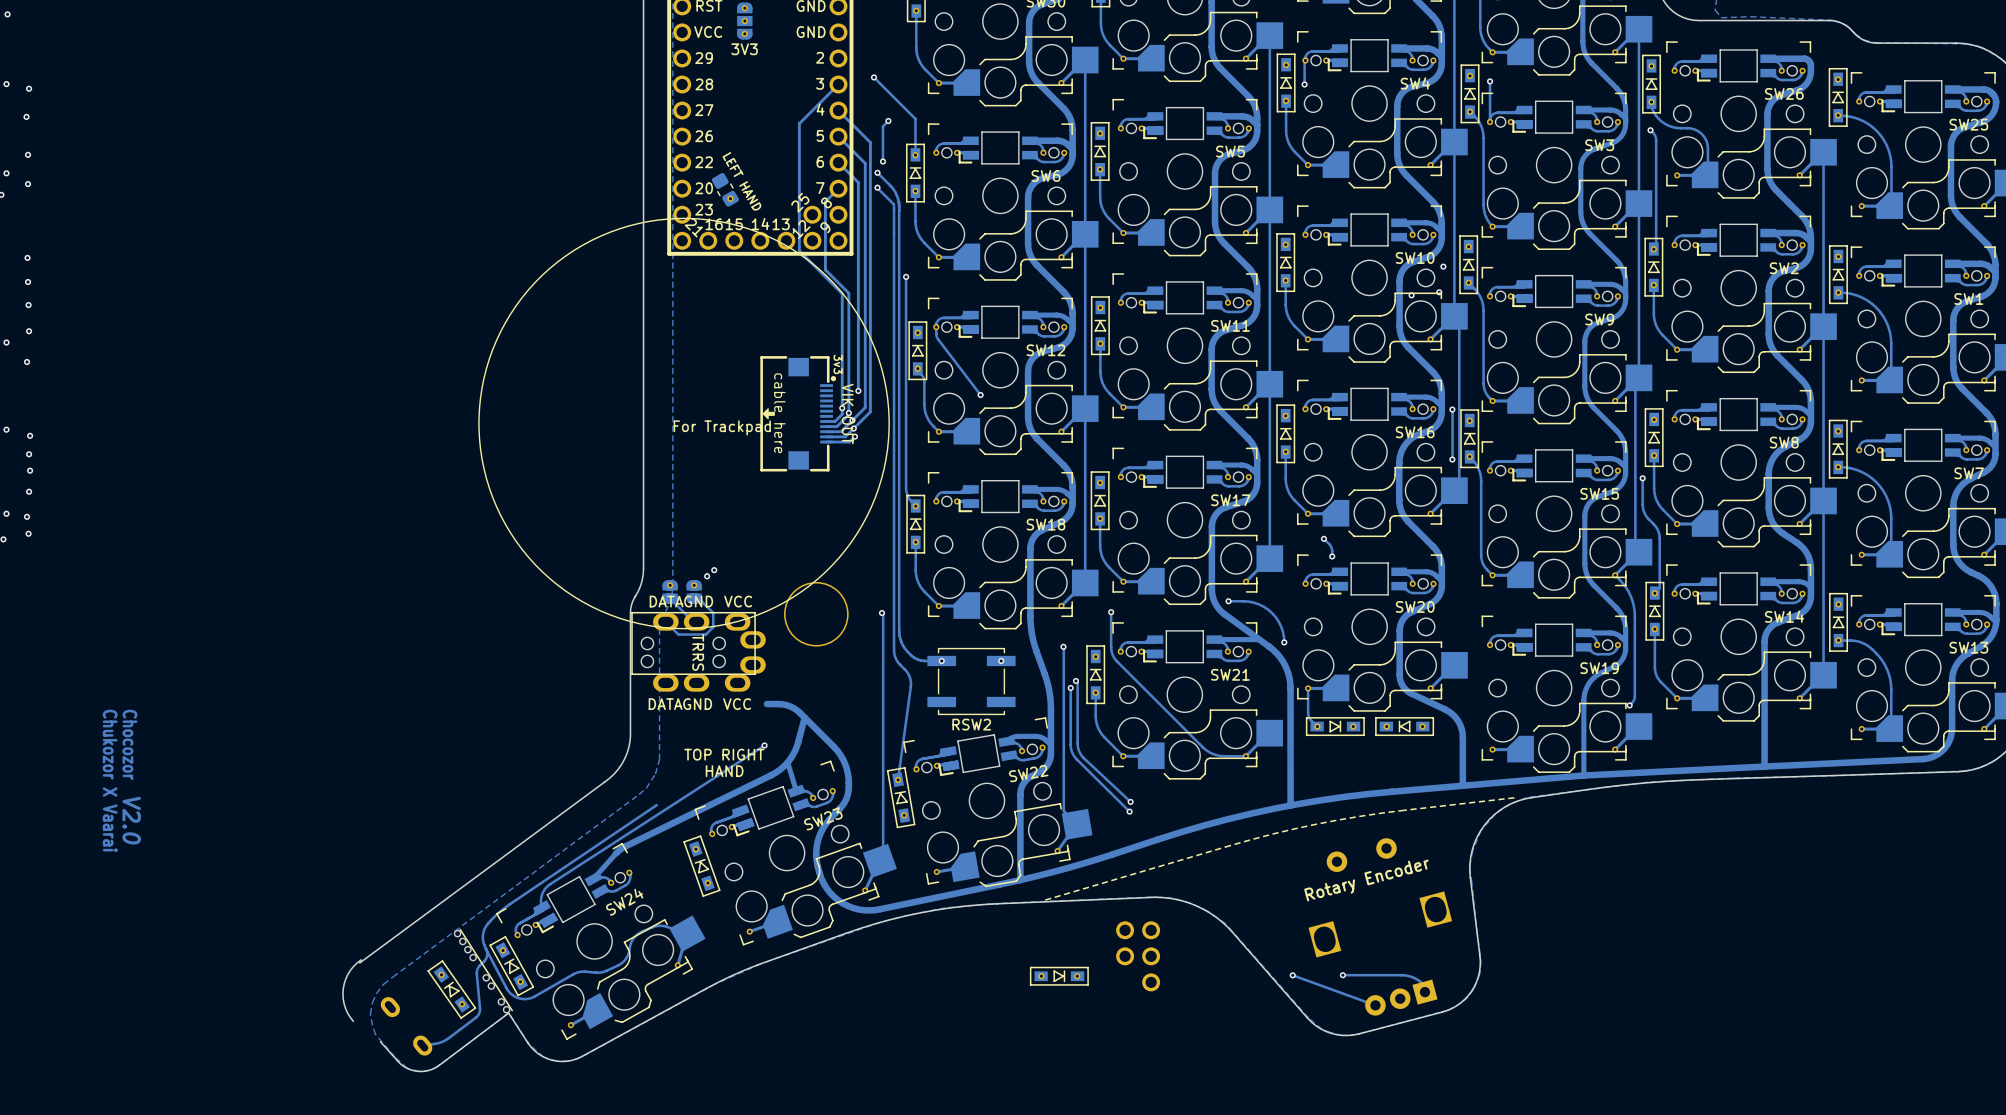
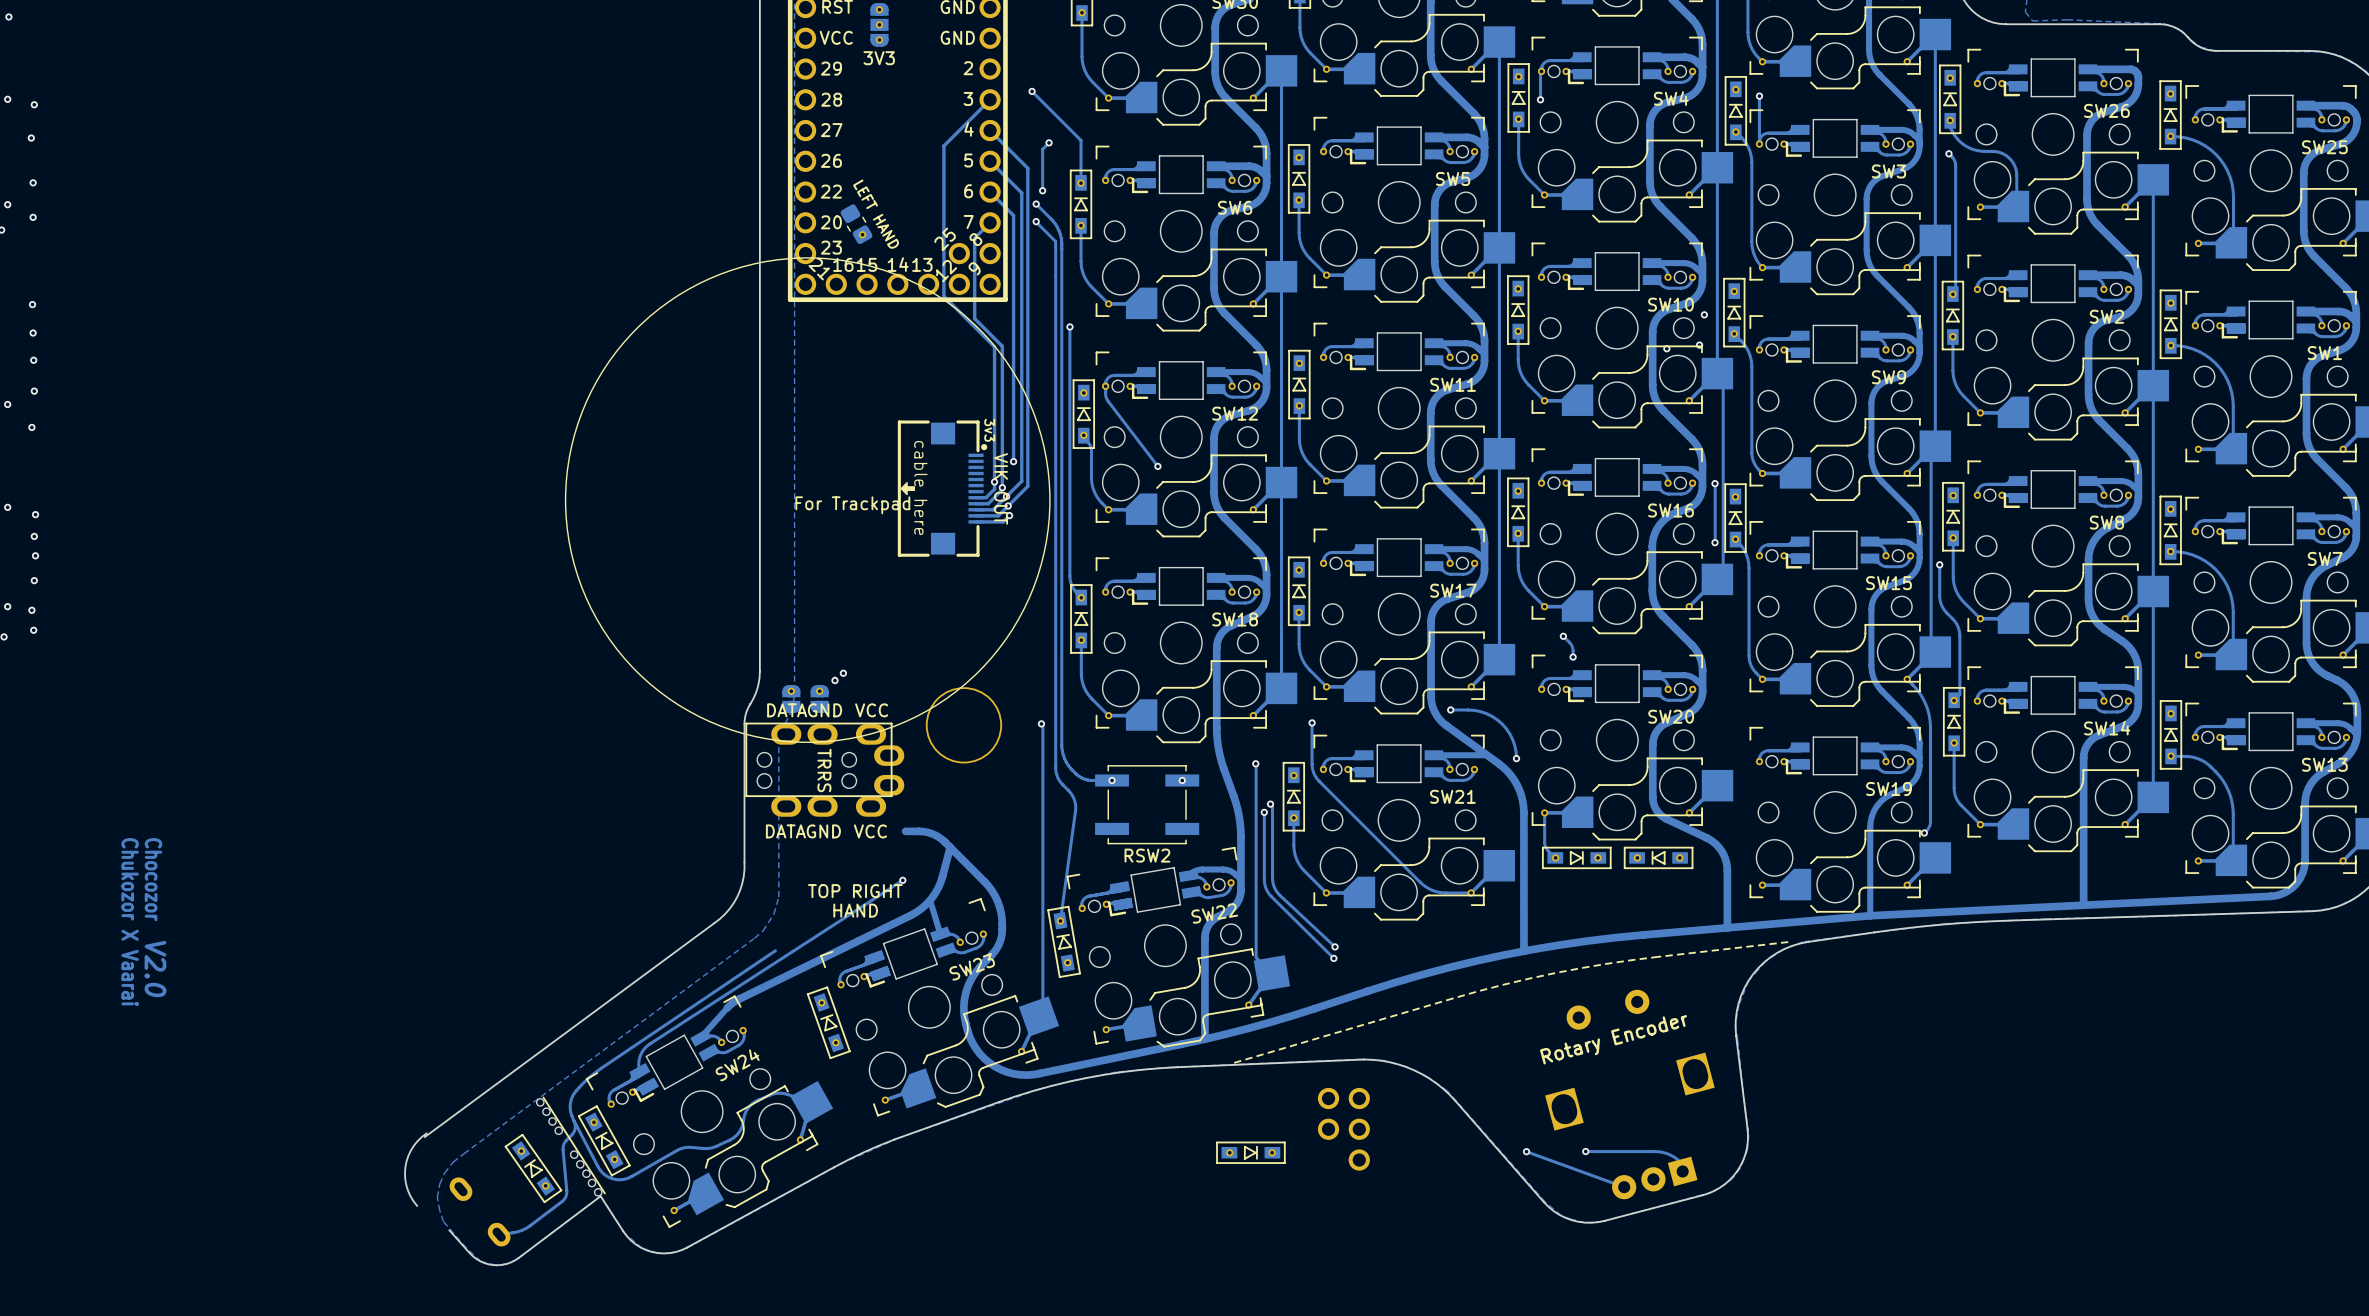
track: (670, 598) (694, 621) -> none
track: (694, 598) (698, 598) (713, 612) (713, 627) (705, 634) (678, 634) (665, 621) -> none
round board edge: none -> [582, 1169, 591, 1178]

